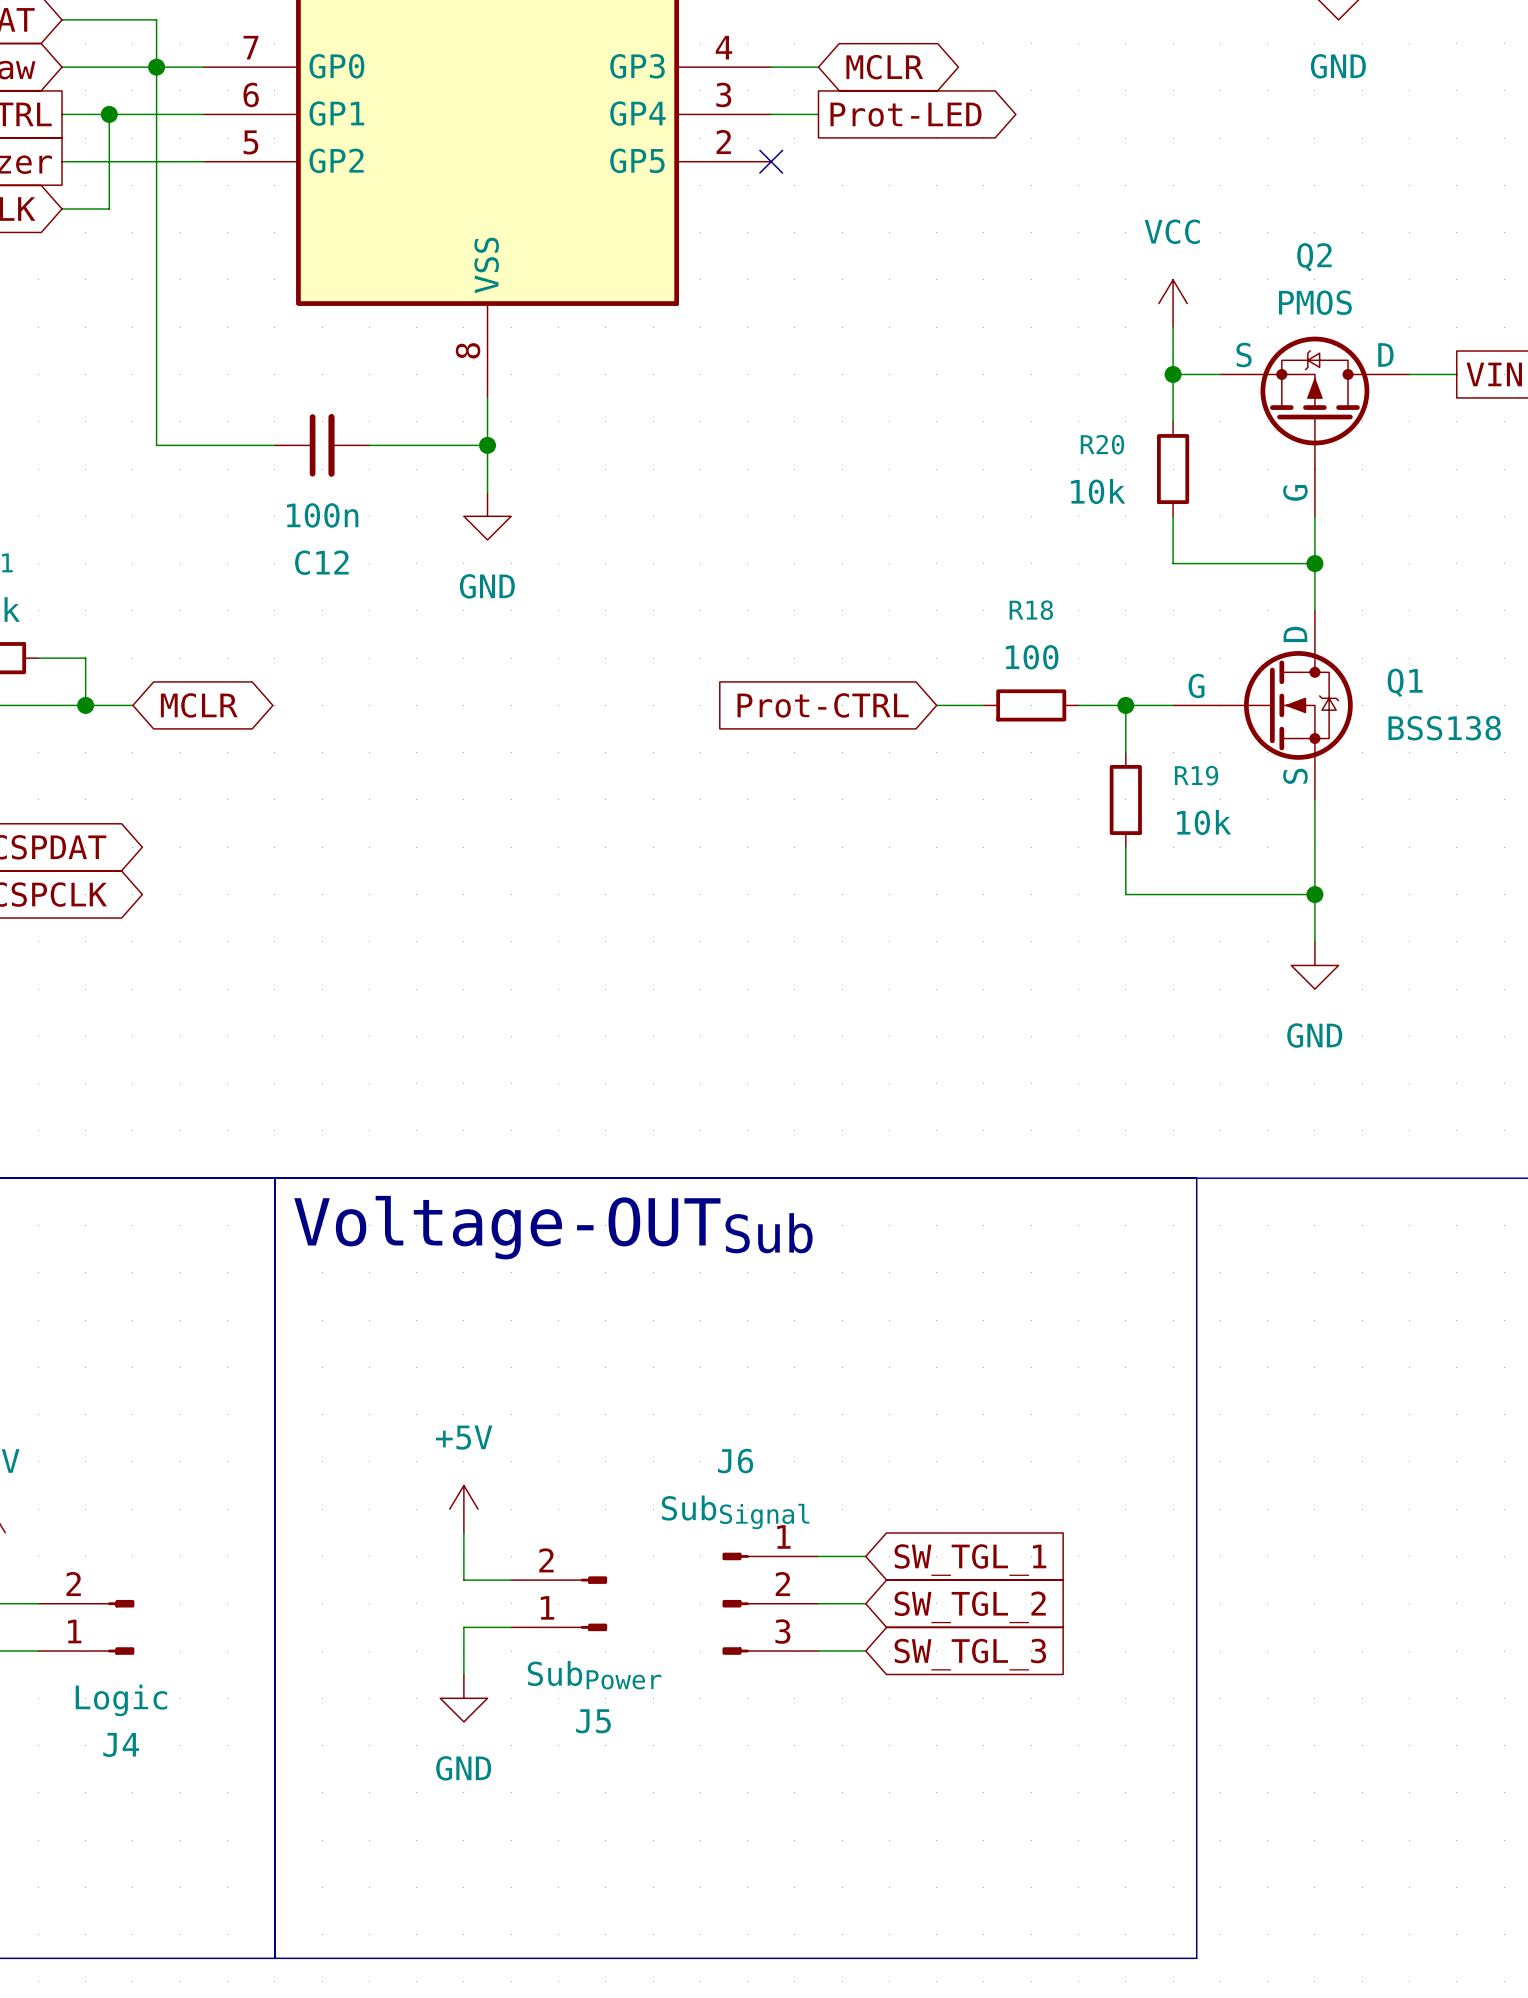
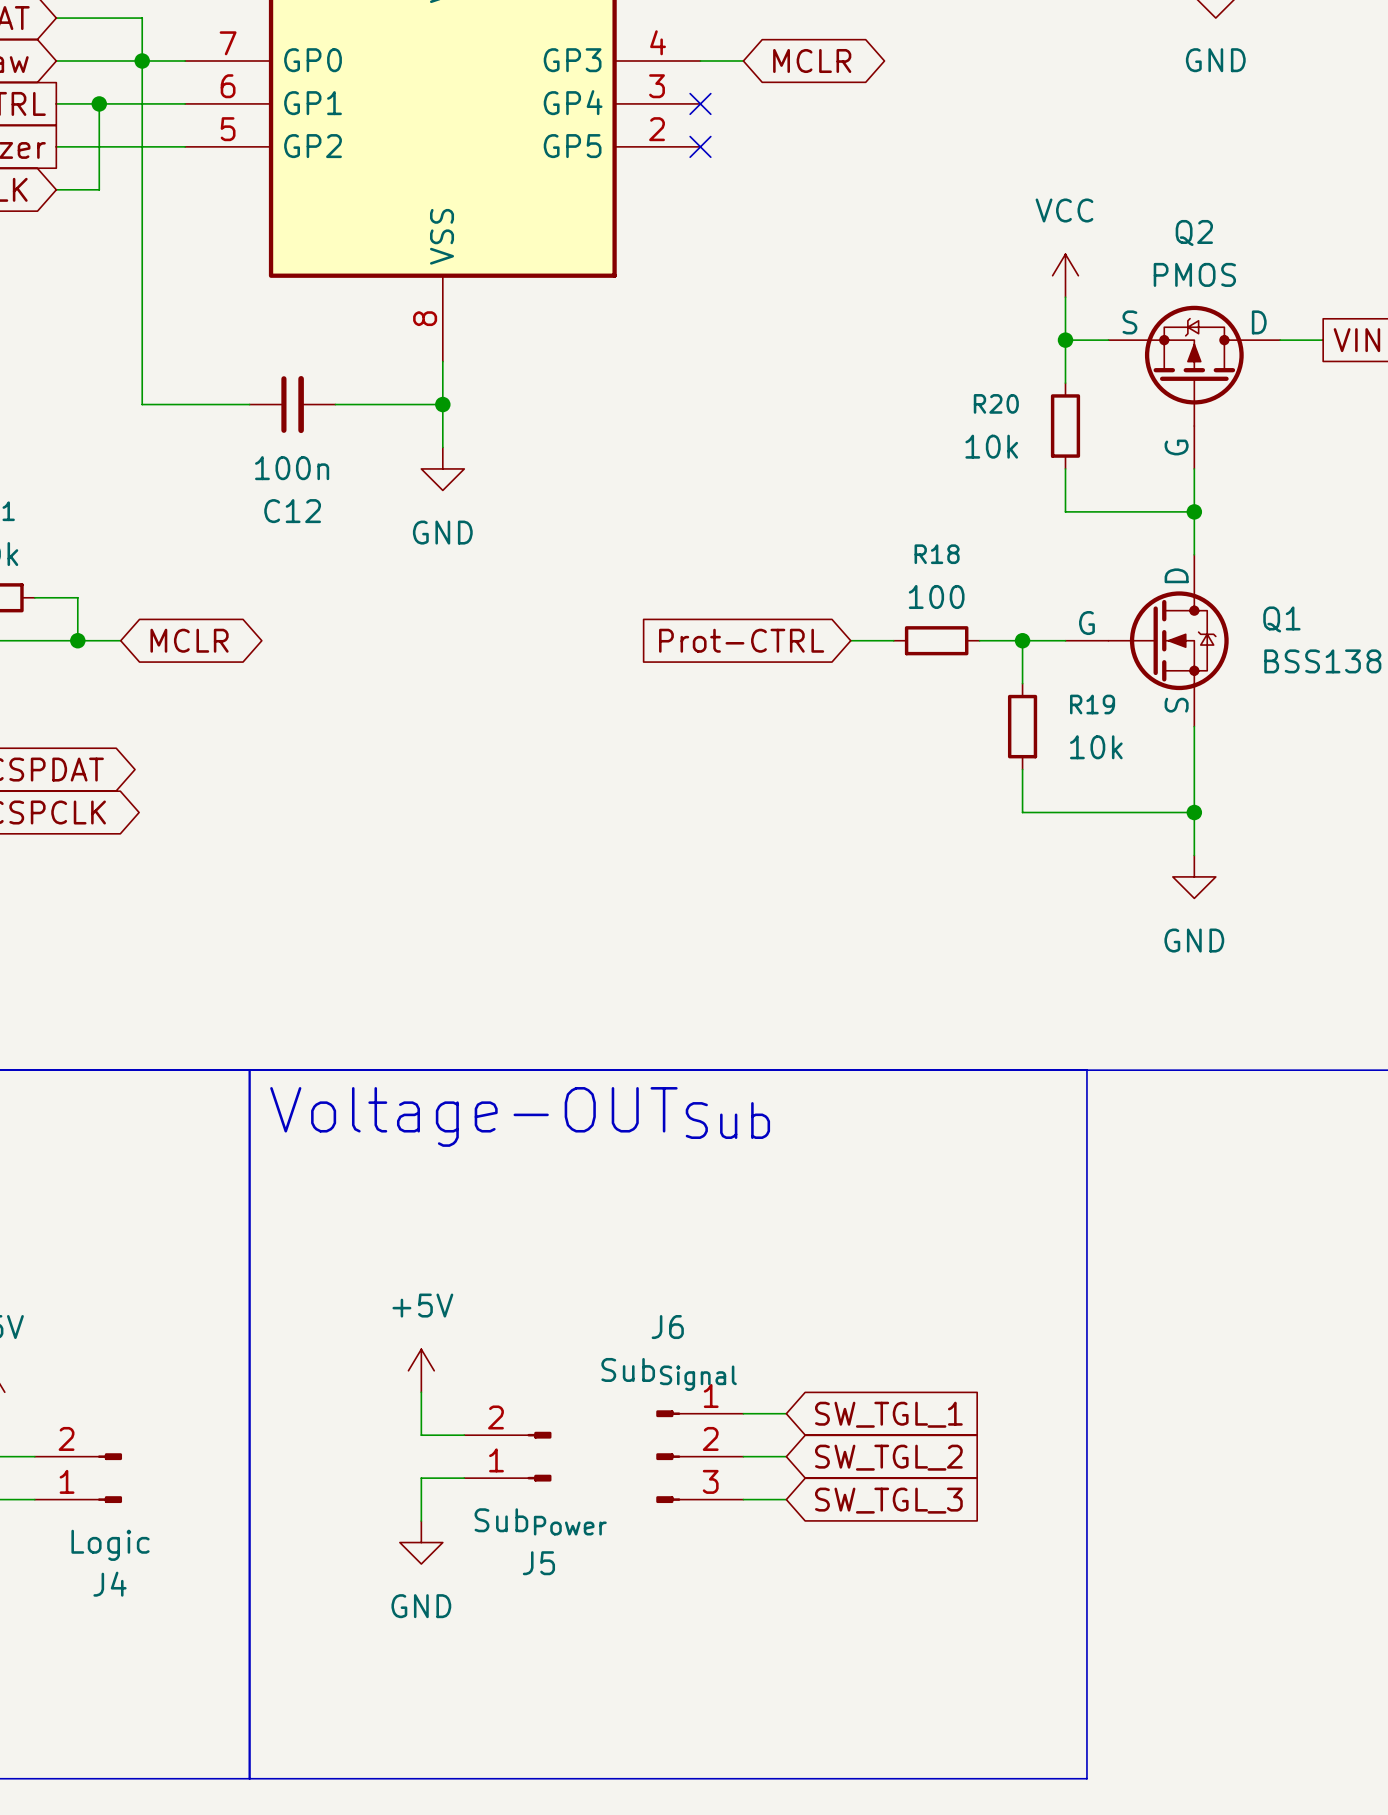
wire: (771, 114) (818, 114) -> none
no-connect mark: none -> (700, 103)
global label: Prot-LED (905, 114) -> none

